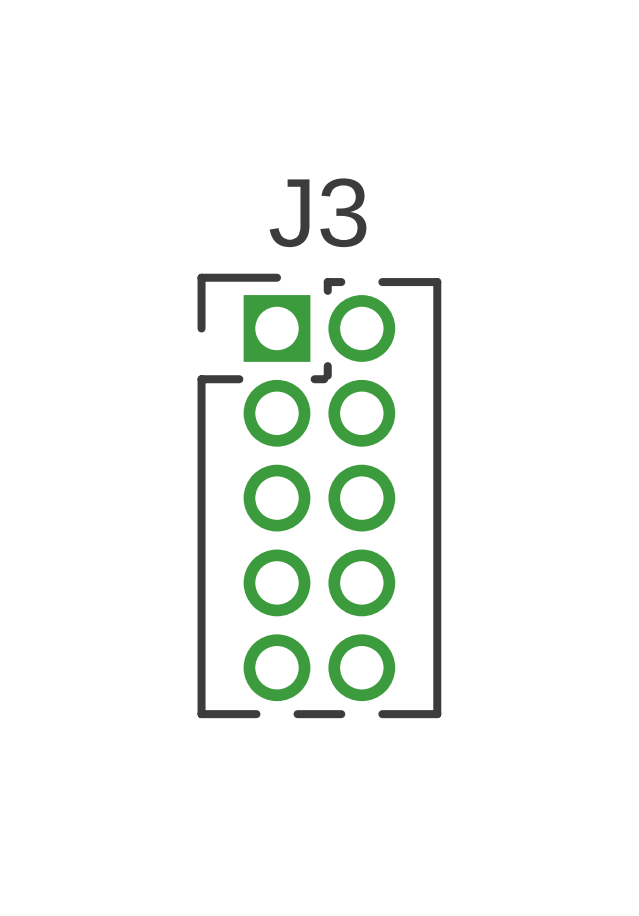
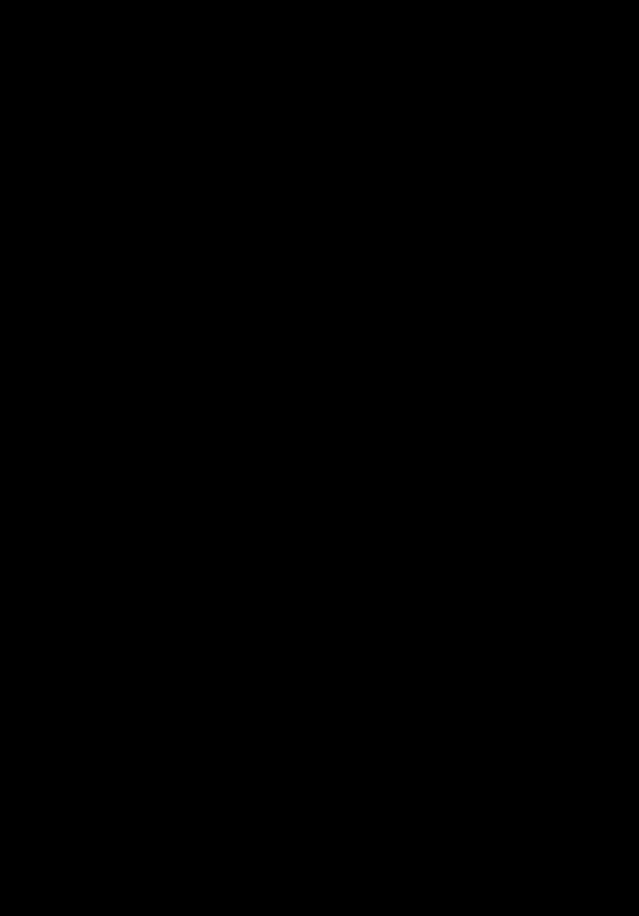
J3: (319, 495) -> none

